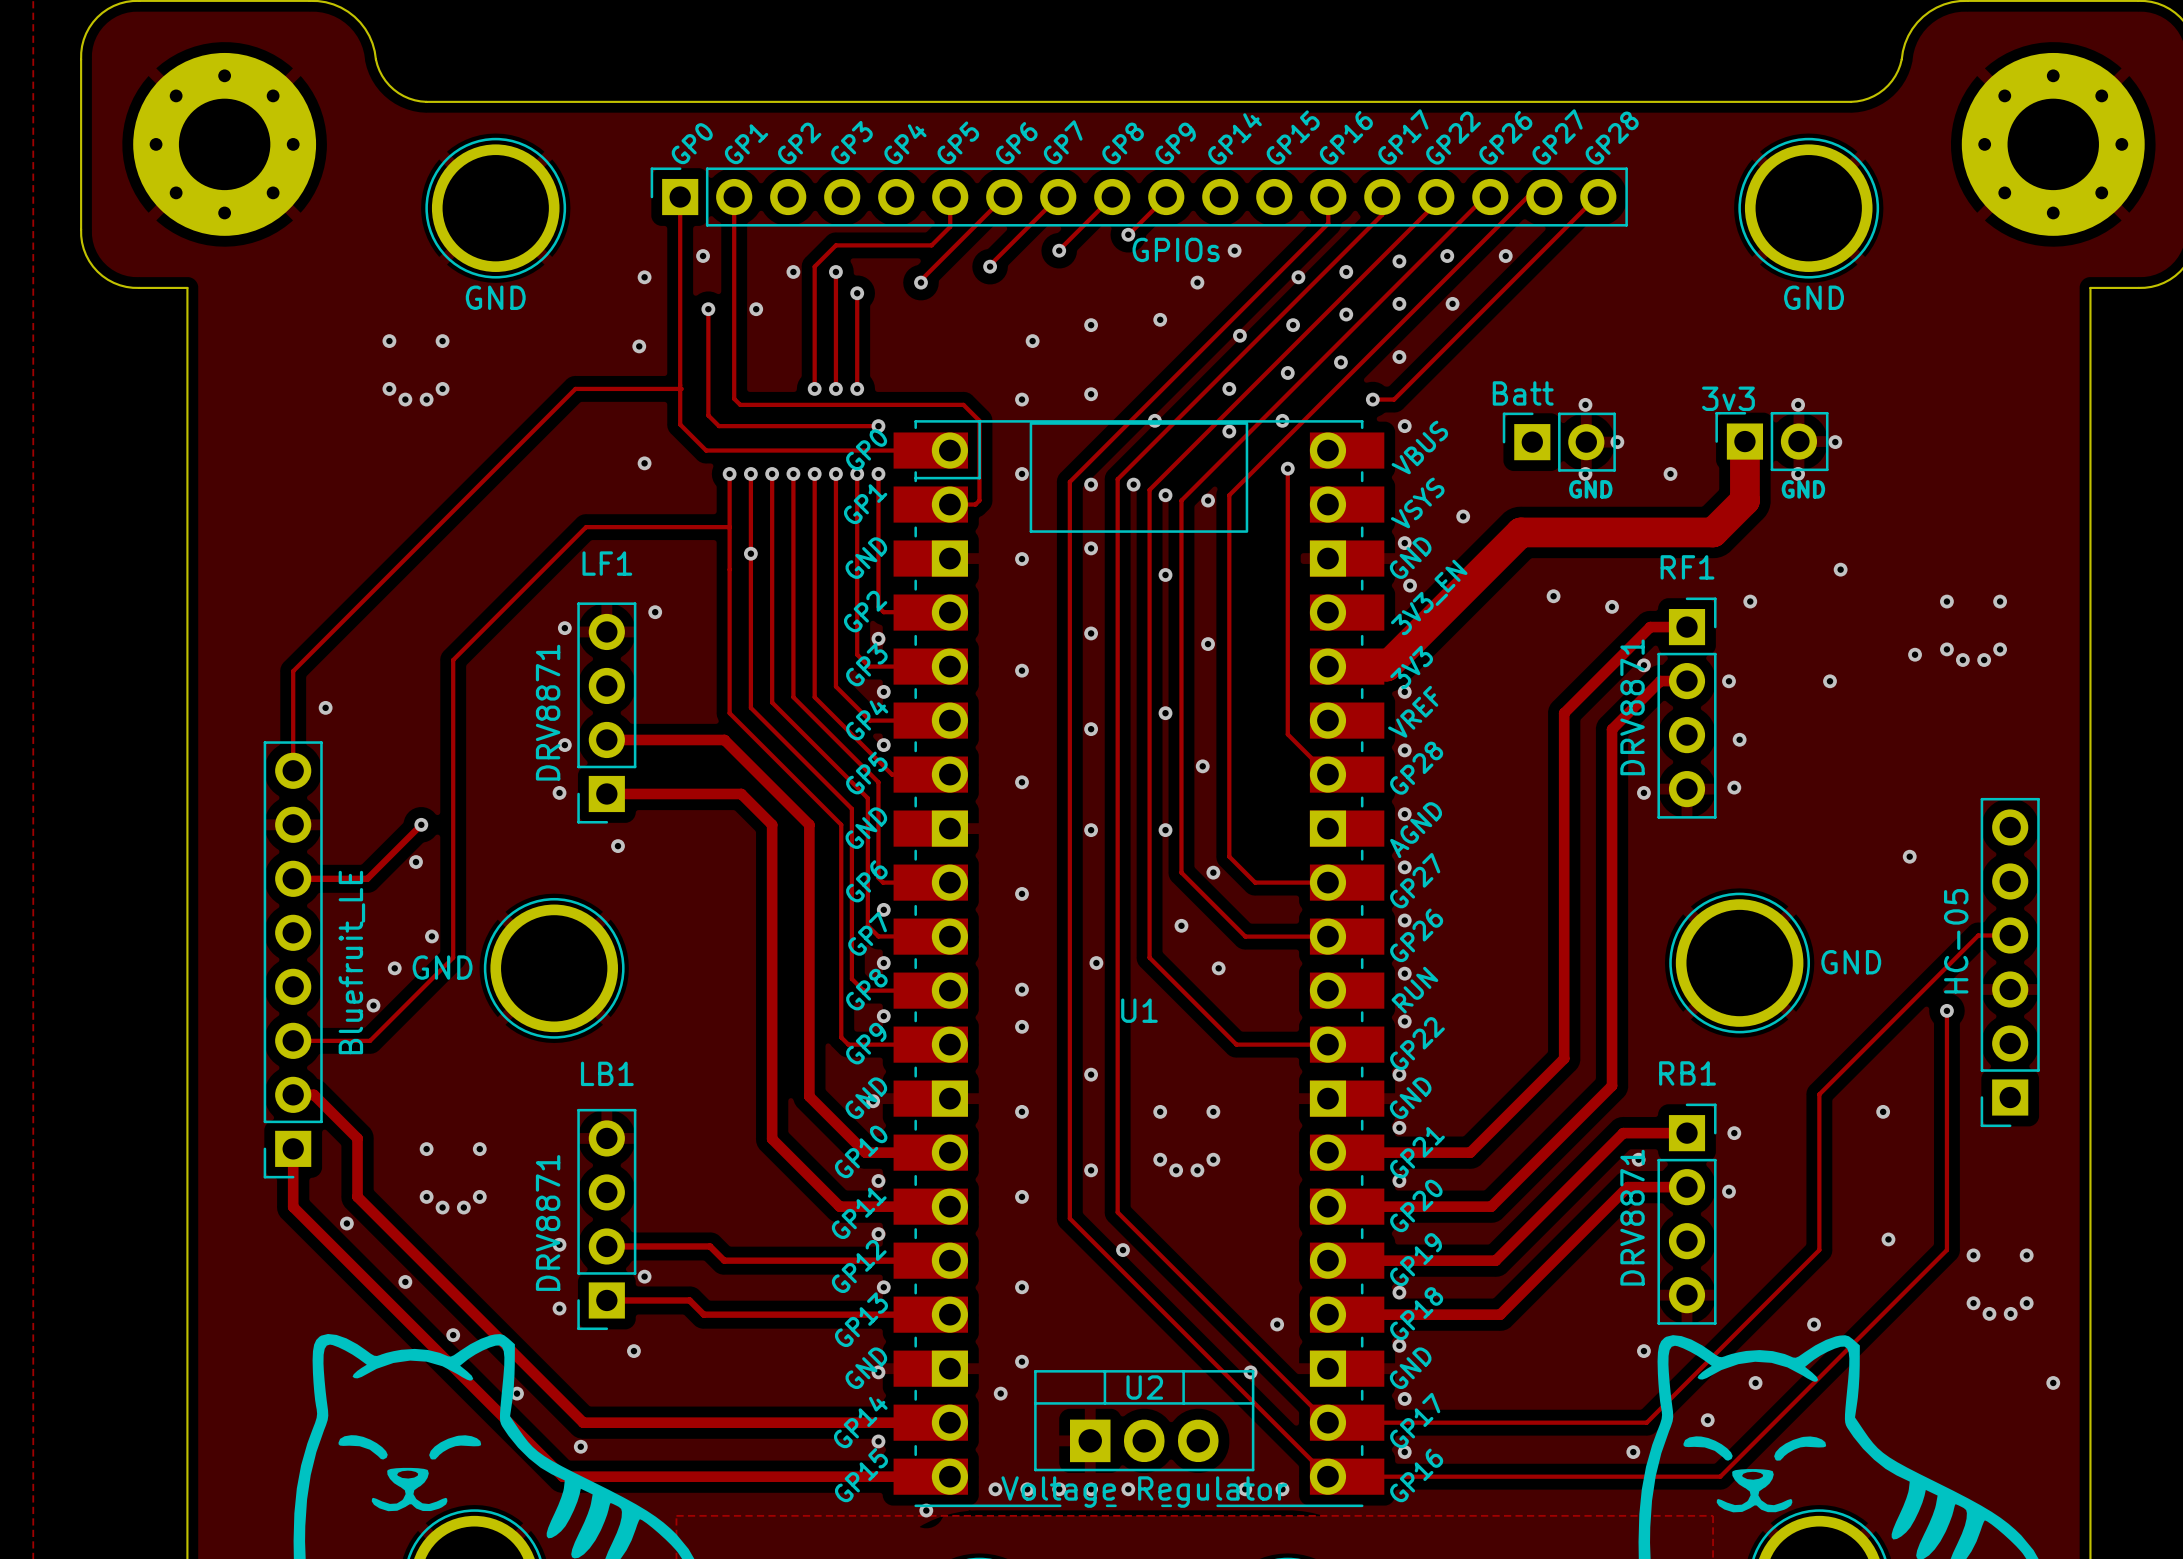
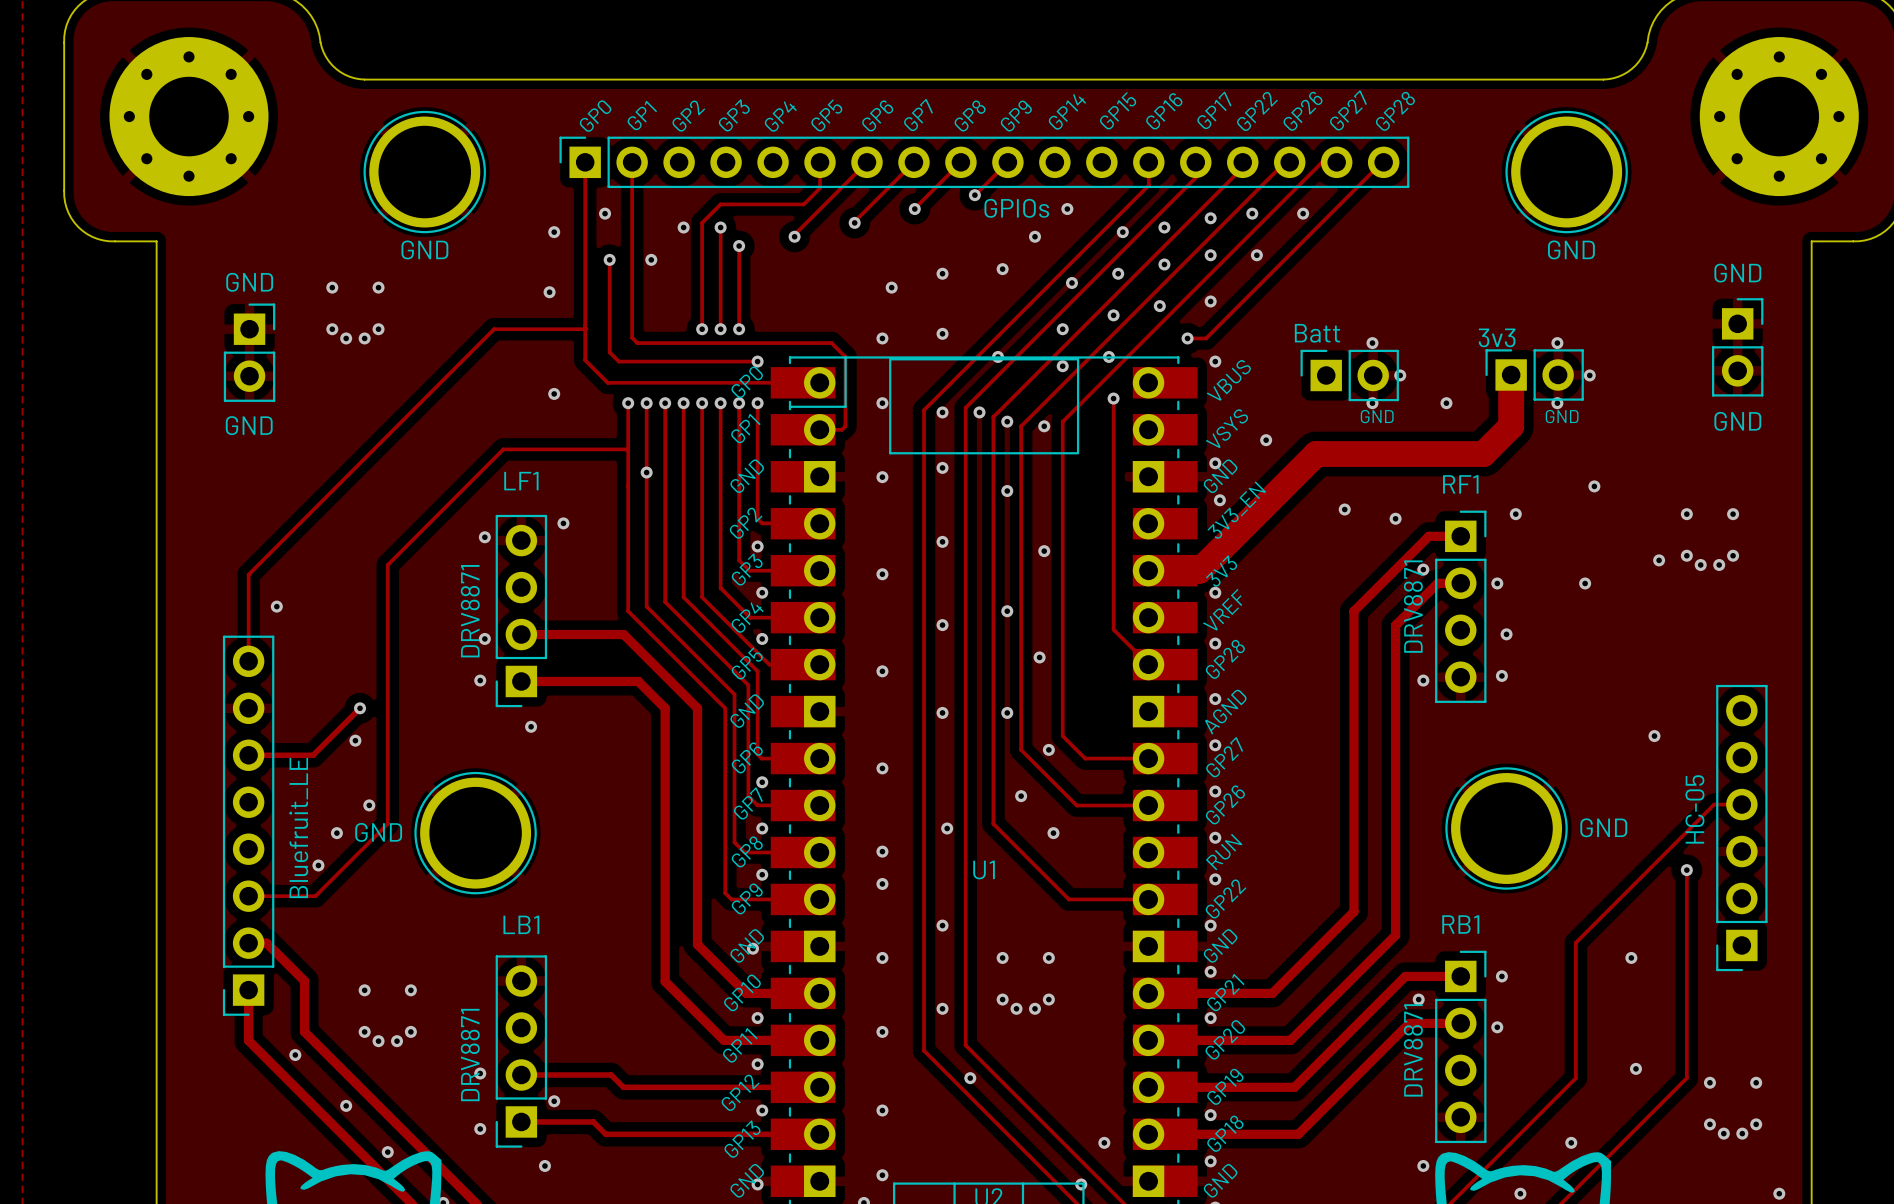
text: none -> GND (1737, 273)
text: none -> GND (249, 282)
part: none -> GND (1737, 347)
part: none -> (249, 352)
text: none -> GND (249, 425)

